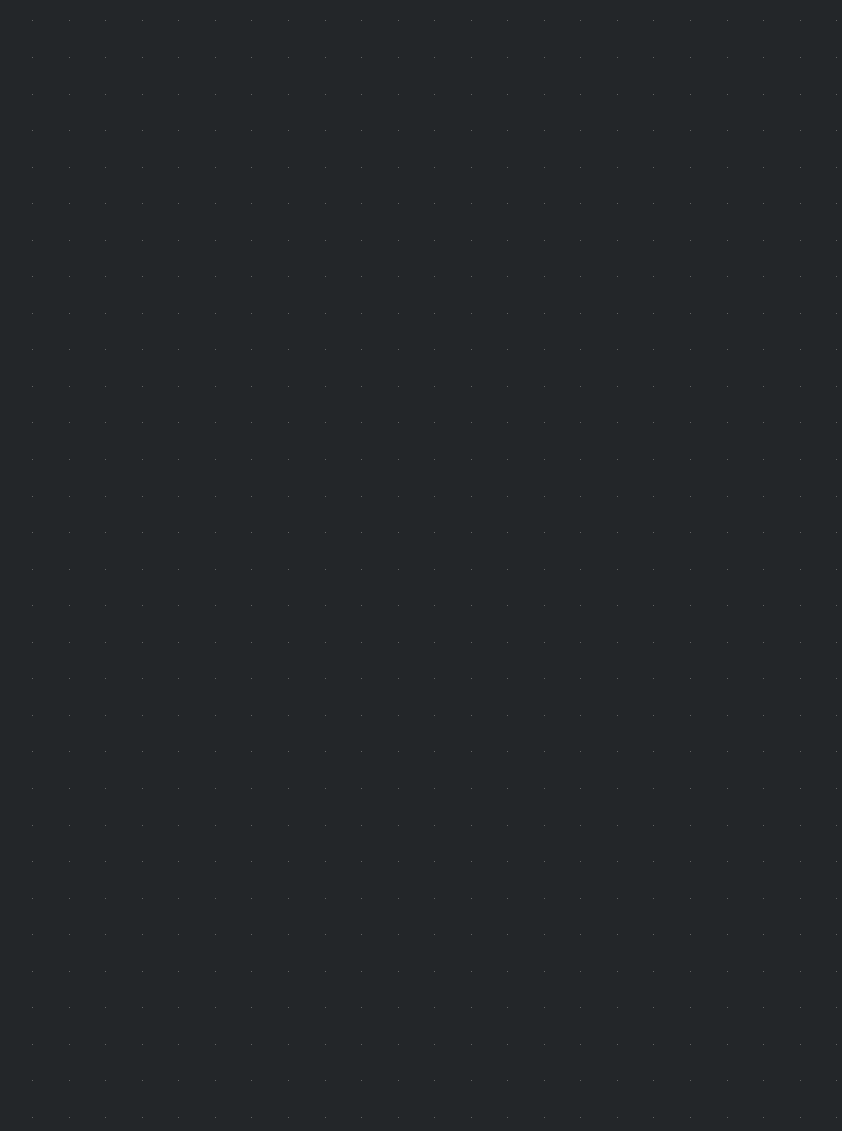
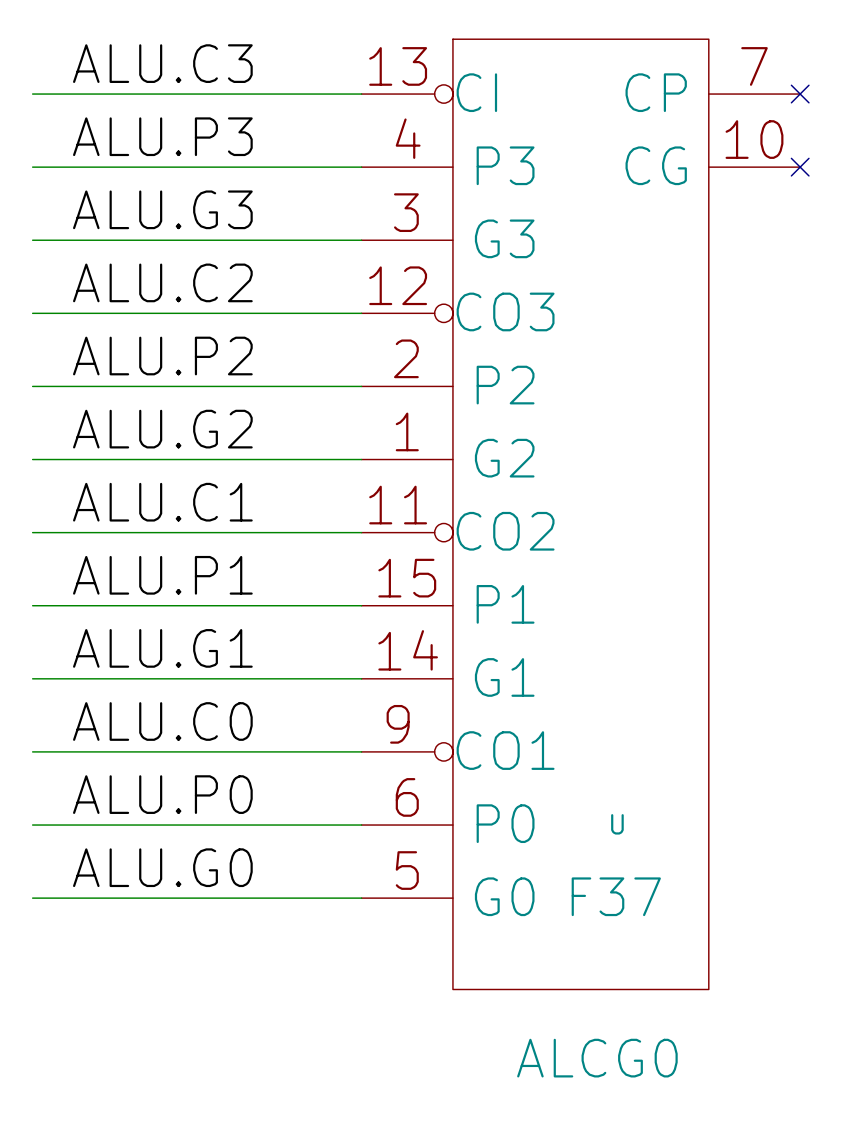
label: none -> ALU.C3 (162, 63)
wire: none -> (32, 94) (361, 94)
no-connect mark: none -> (800, 94)
label: none -> ALU.P3 (162, 136)
wire: none -> (32, 167) (361, 167)
no-connect mark: none -> (800, 167)
label: none -> ALU.G3 (162, 209)
wire: none -> (32, 240) (361, 240)
label: none -> ALU.C2 (162, 282)
wire: none -> (32, 313) (361, 313)
label: none -> ALU.P2 (162, 356)
wire: none -> (32, 386) (361, 386)
label: none -> ALU.G2 (162, 429)
wire: none -> (32, 459) (361, 459)
label: none -> ALU.C1 (162, 502)
U: none -> (580, 514)
wire: none -> (32, 532) (361, 532)
label: none -> ALU.P1 (162, 575)
wire: none -> (32, 605) (361, 605)
label: none -> ALU.G1 (162, 648)
wire: none -> (32, 678) (361, 678)
label: none -> ALU.C0 (162, 721)
wire: none -> (32, 751) (361, 751)
label: none -> ALU.P0 (162, 794)
wire: none -> (32, 825) (361, 825)
label: none -> ALU.G0 (162, 867)
wire: none -> (32, 898) (361, 898)

